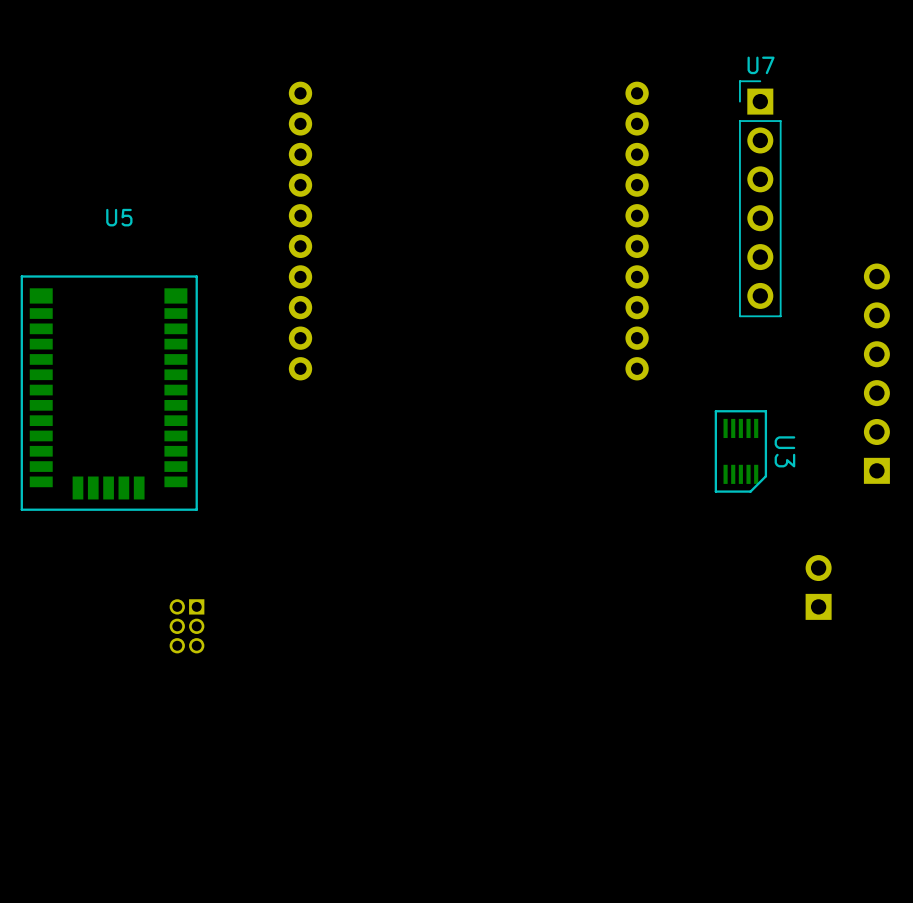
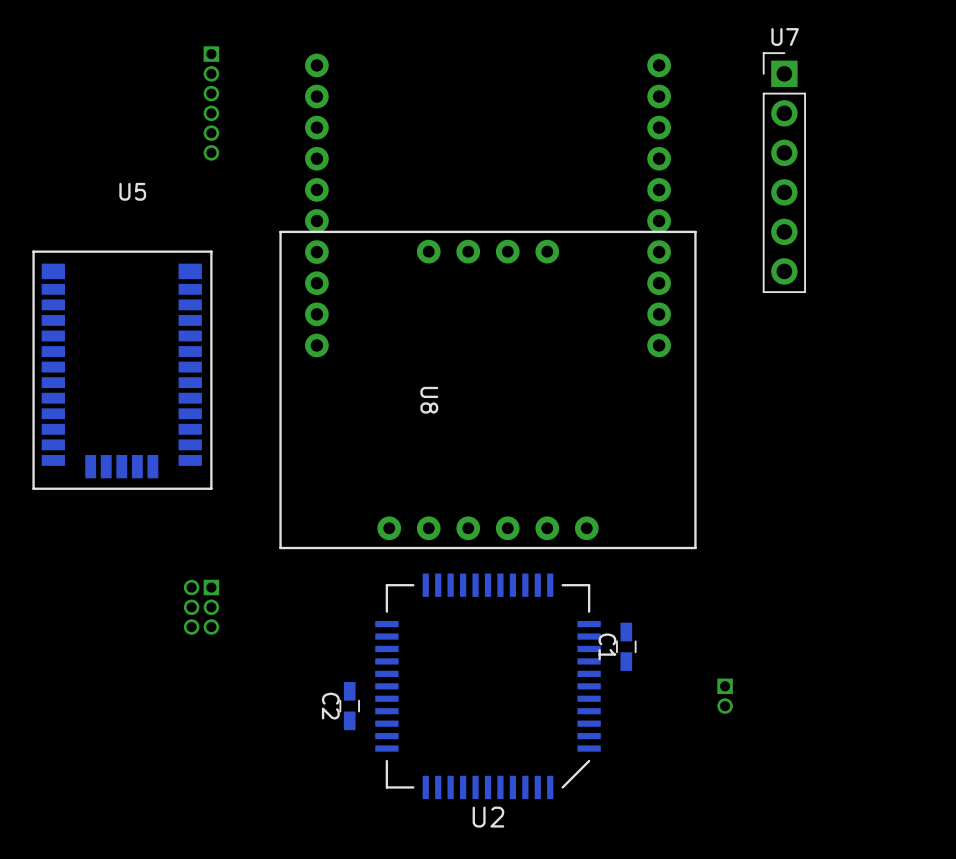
part: none -> (211, 103)
part: (876, 373) -> none
U8: none -> (488, 389)
U3: (740, 451) -> none
part: (818, 587) -> none
C1: none -> (626, 646)
U2: none -> (488, 686)
part: none -> (725, 696)
C2: none -> (349, 706)

